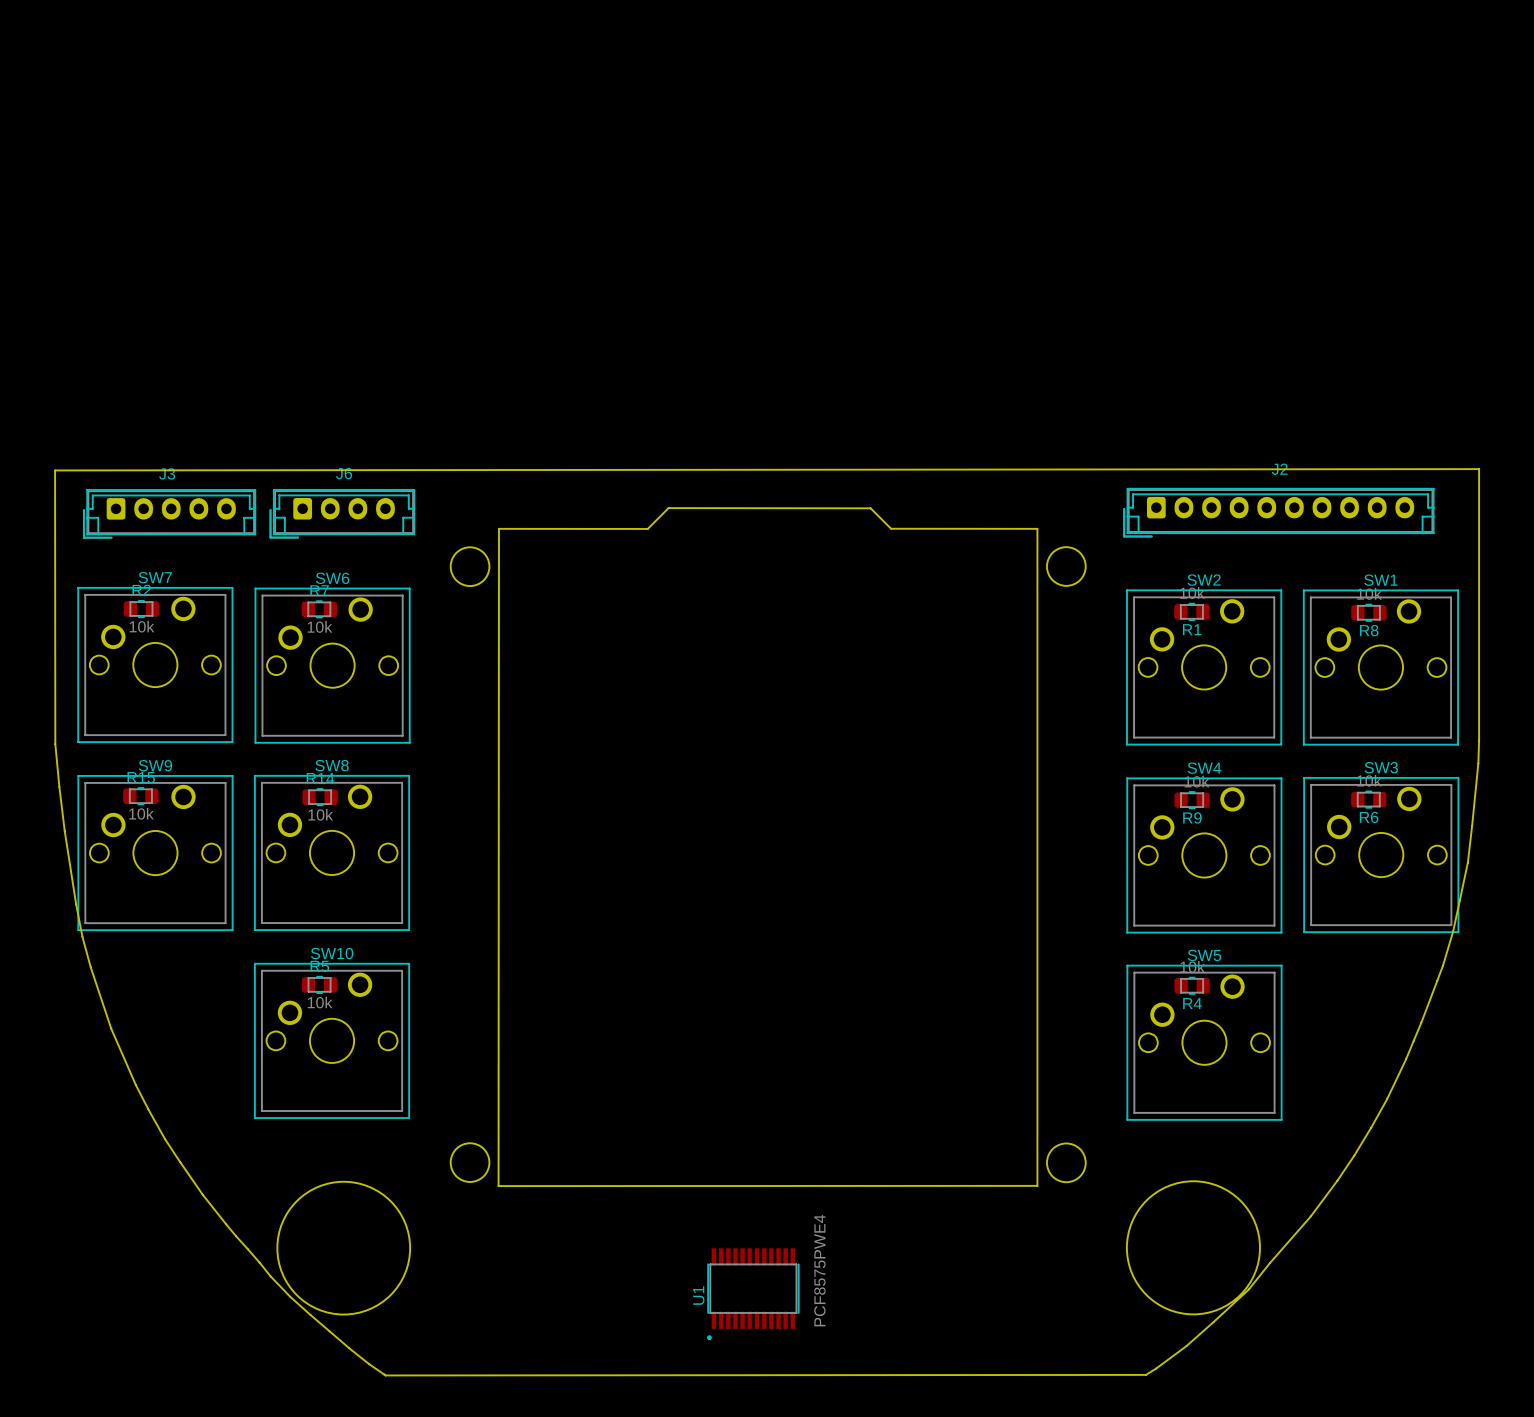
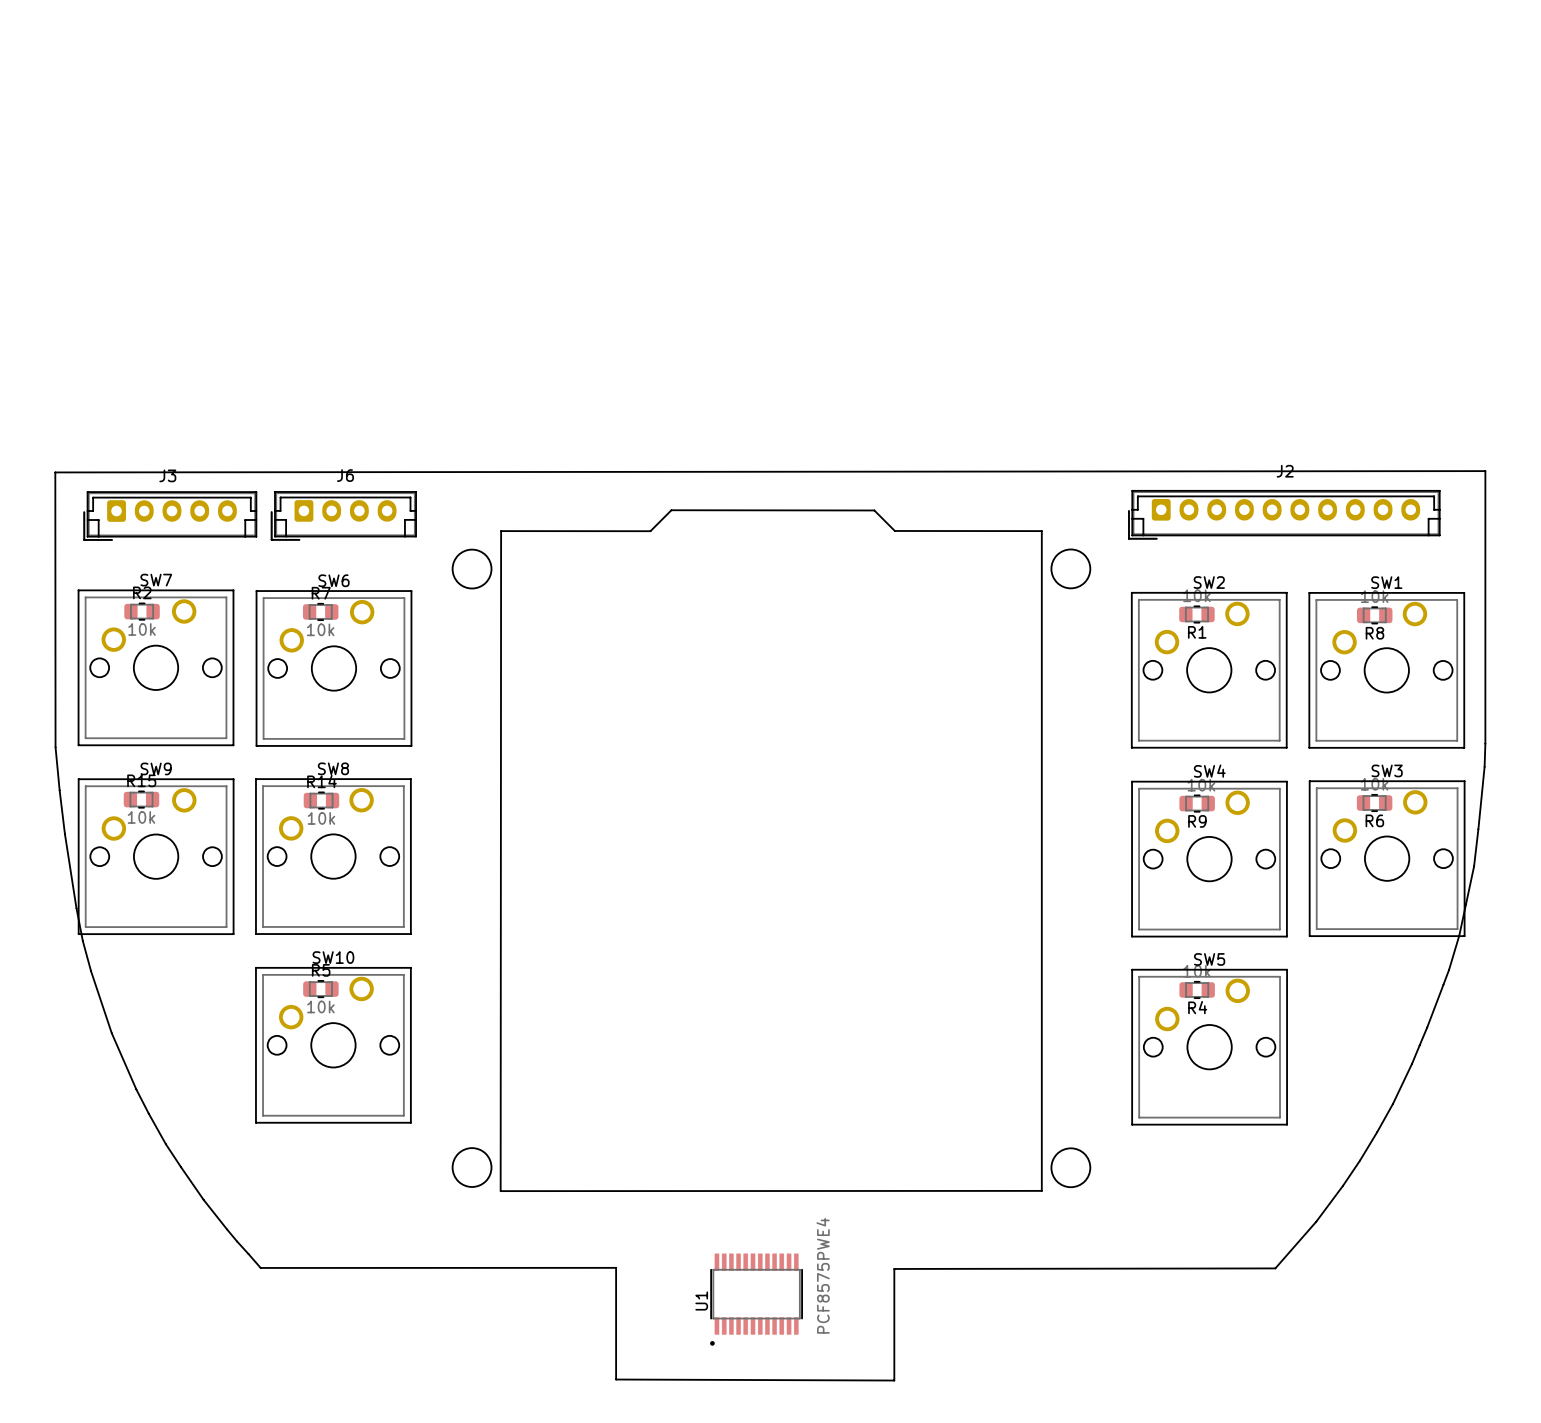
round board edge: [1126, 1180, 1261, 1315] -> none
round board edge: [276, 1181, 411, 1316] -> none
board edge: (259, 1262) (290, 1296) (310, 1315) (349, 1348) (385, 1375) (1145, 1374) (1186, 1346) (1213, 1322) (1248, 1289) (1269, 1263) -> (260, 1267) (616, 1267) (616, 1379) (894, 1380) (894, 1268) (1275, 1268)

